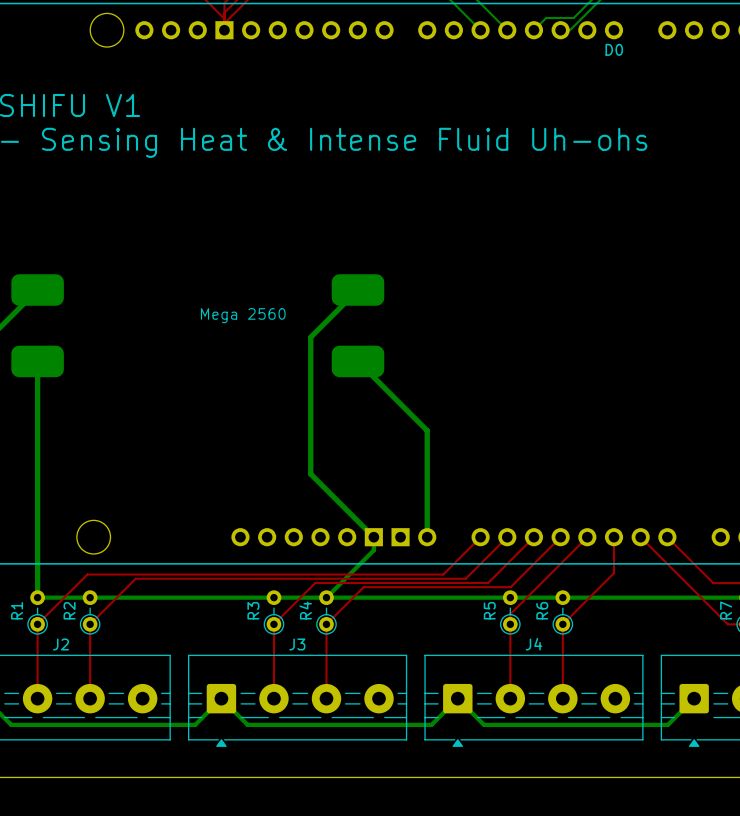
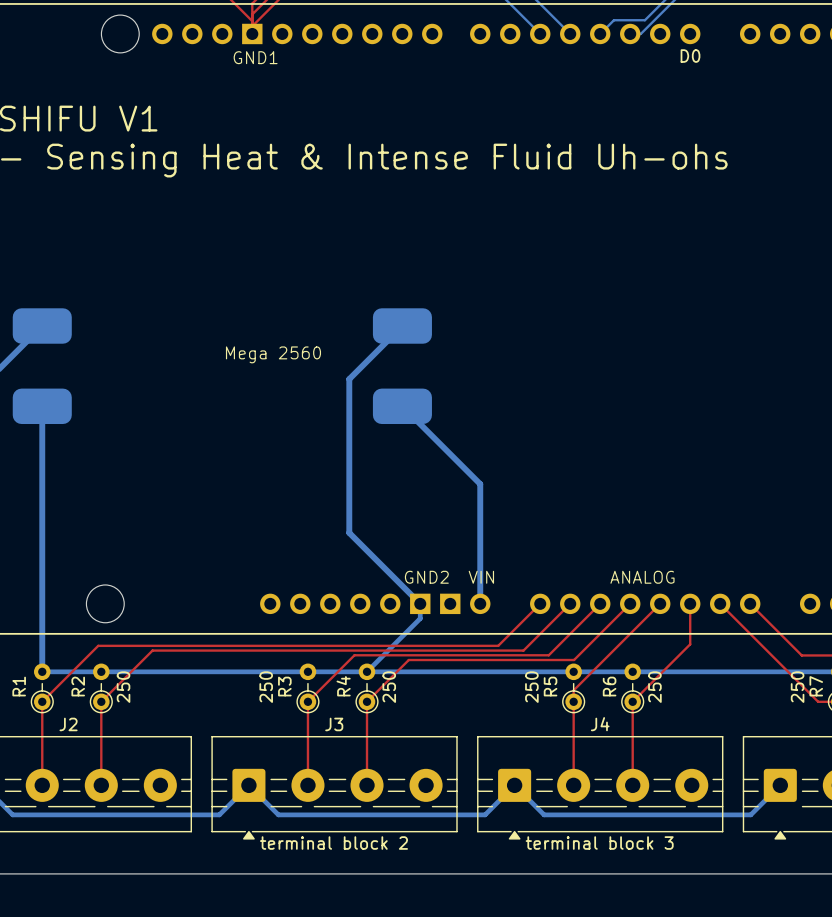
text: none -> GND1 (255, 57)
text: none -> GND2 (426, 577)
text: none -> VIN (481, 577)
text: none -> ANALOG (642, 577)
R2 value: none -> 250 (123, 687)
R3 value: none -> 250 (266, 687)
R4 value: none -> 250 (389, 687)
R5 value: none -> 250 (531, 687)
R6 value: none -> 250 (654, 687)
R7 value: none -> 250 (797, 687)
J3 value: none -> terminal block 2 (333, 843)
J4 value: none -> terminal block 3 (599, 843)

